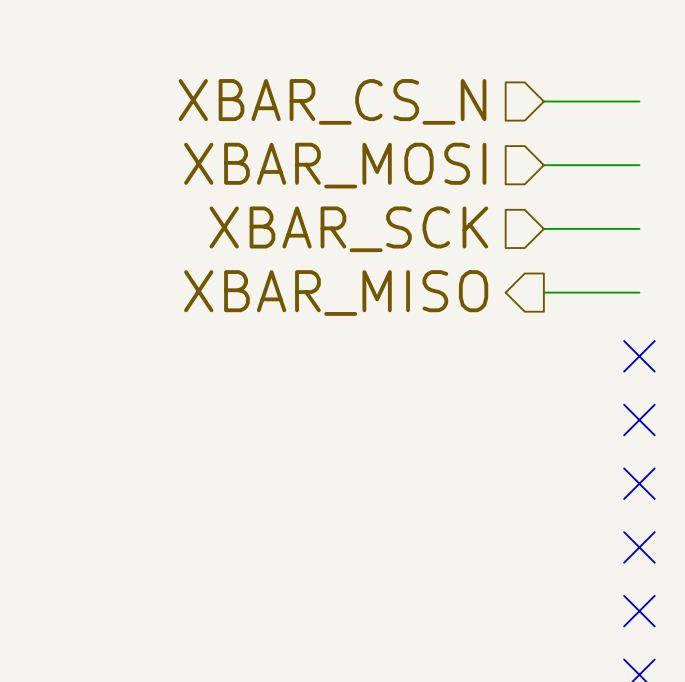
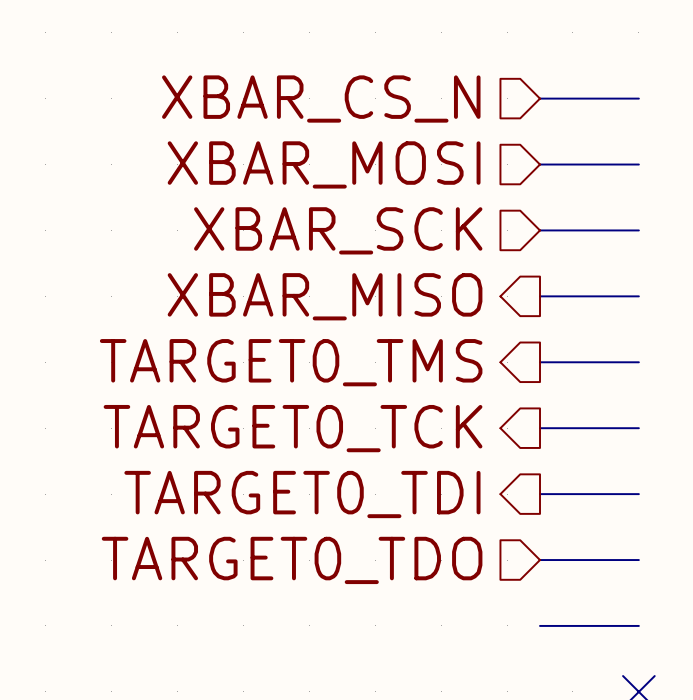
hierarchical label: none -> TARGET0_TMS (291, 362)
wire: none -> (540, 362) (638, 362)
no-connect mark: (639, 356) -> none
hierarchical label: none -> TARGET0_TCK (293, 428)
wire: none -> (540, 428) (638, 428)
no-connect mark: (639, 420) -> none
wire: none -> (540, 494) (638, 494)
no-connect mark: (639, 483) -> none
hierarchical label: none -> TARGET0_TDI (302, 494)
hierarchical label: none -> TARGET0_TDO (292, 560)
wire: none -> (540, 560) (638, 560)
no-connect mark: (639, 547) -> none
wire: none -> (540, 625) (638, 625)
no-connect mark: (639, 611) -> none

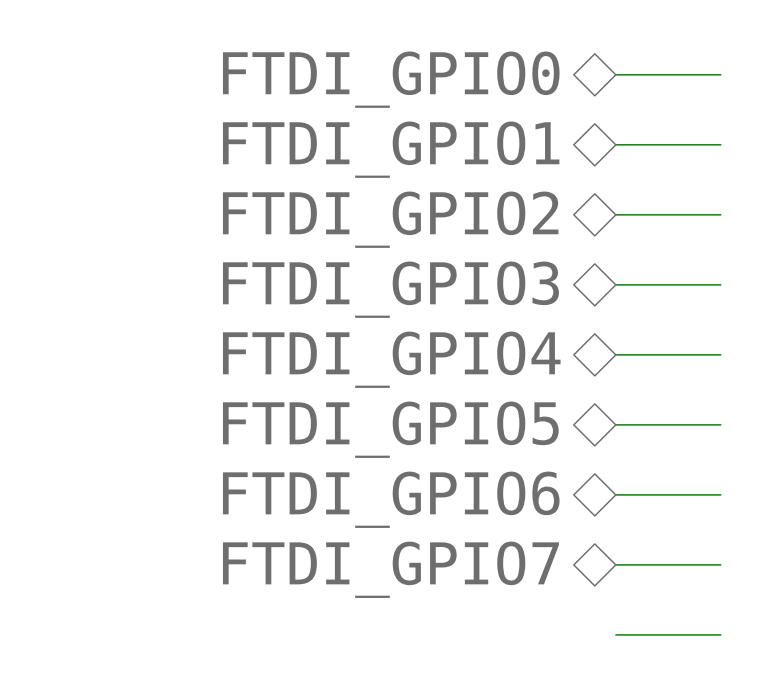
hierarchical label shape: input (321, 99) -> bidirectional (391, 79)
hierarchical label: XBAR_CS_N (321, 99) -> FTDI_GPIO0 (391, 79)
hierarchical label shape: input (324, 164) -> bidirectional (391, 149)
hierarchical label: XBAR_MOSI (324, 164) -> FTDI_GPIO1 (391, 149)
hierarchical label shape: input (338, 230) -> bidirectional (390, 219)
hierarchical label: XBAR_SCK (338, 230) -> FTDI_GPIO2 (390, 219)
hierarchical label shape: output (325, 296) -> bidirectional (390, 289)
hierarchical label: XBAR_MISO (325, 296) -> FTDI_GPIO3 (390, 289)
hierarchical label shape: output (291, 362) -> bidirectional (391, 359)
hierarchical label: TARGET0_TMS (291, 362) -> FTDI_GPIO4 (391, 359)
hierarchical label shape: output (293, 428) -> bidirectional (390, 429)
hierarchical label: TARGET0_TCK (293, 428) -> FTDI_GPIO5 (390, 429)
hierarchical label shape: output (302, 494) -> bidirectional (391, 499)
hierarchical label: TARGET0_TDI (302, 494) -> FTDI_GPIO6 (391, 499)
hierarchical label shape: input (292, 560) -> bidirectional (390, 569)
hierarchical label: TARGET0_TDO (292, 560) -> FTDI_GPIO7 (390, 569)

